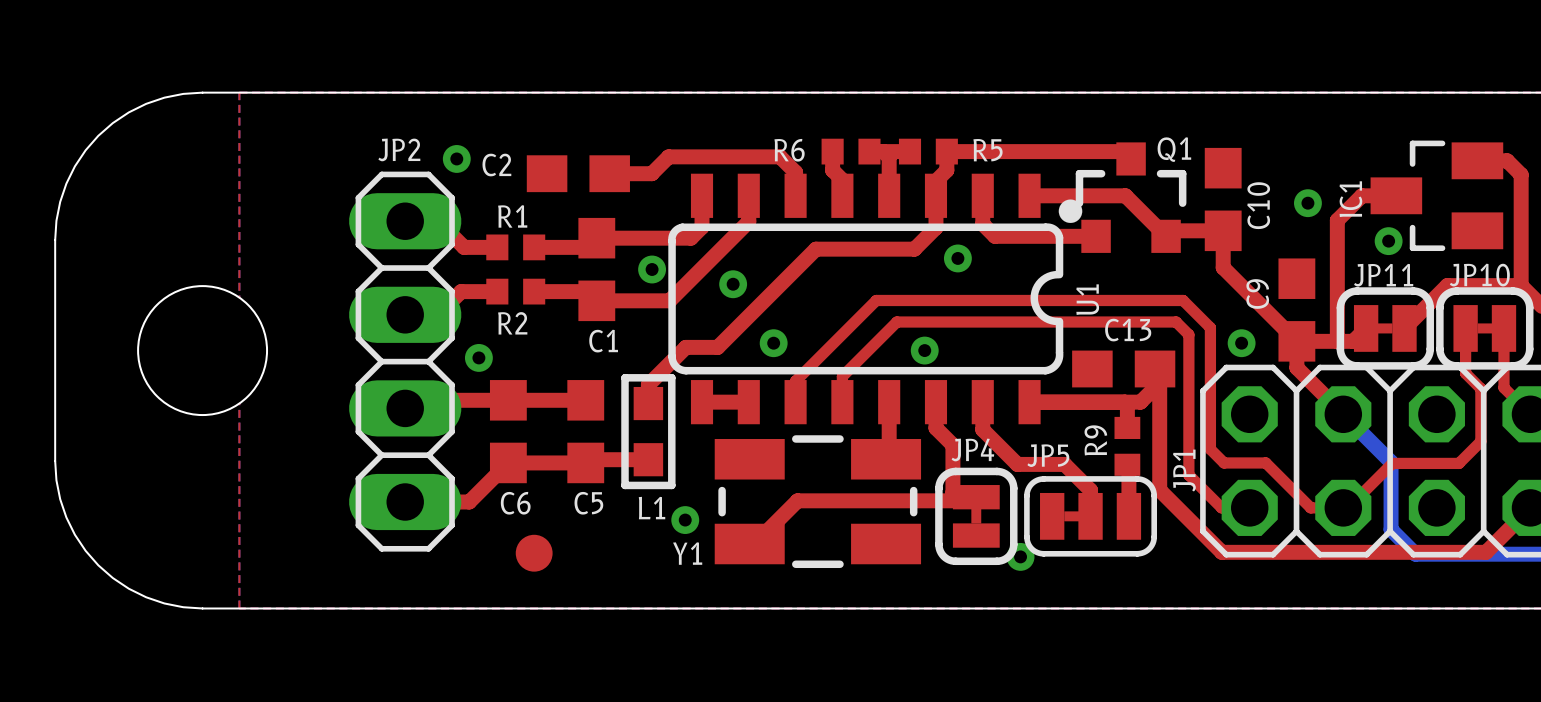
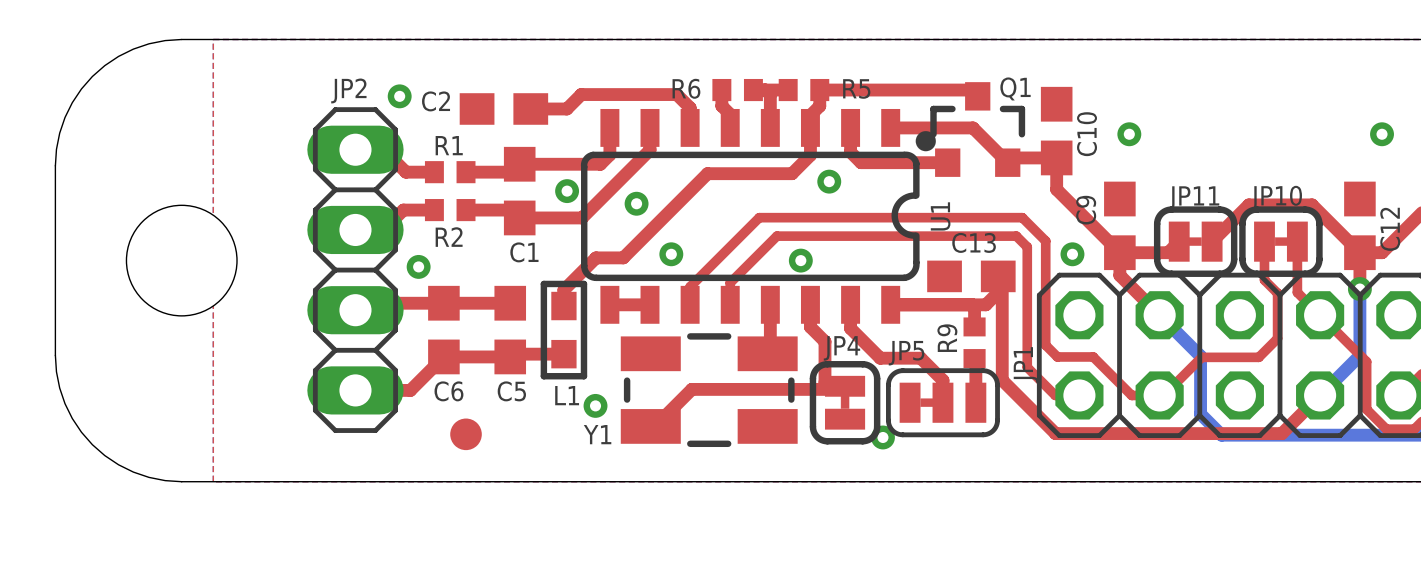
top track: (1477, 160) (1507, 160) (1521, 174) (1521, 285) -> none
top track: (1396, 195) (1361, 195) (1337, 220) (1337, 341) -> none
IC1: (1436, 195) -> none
via: (1388, 241) -> none

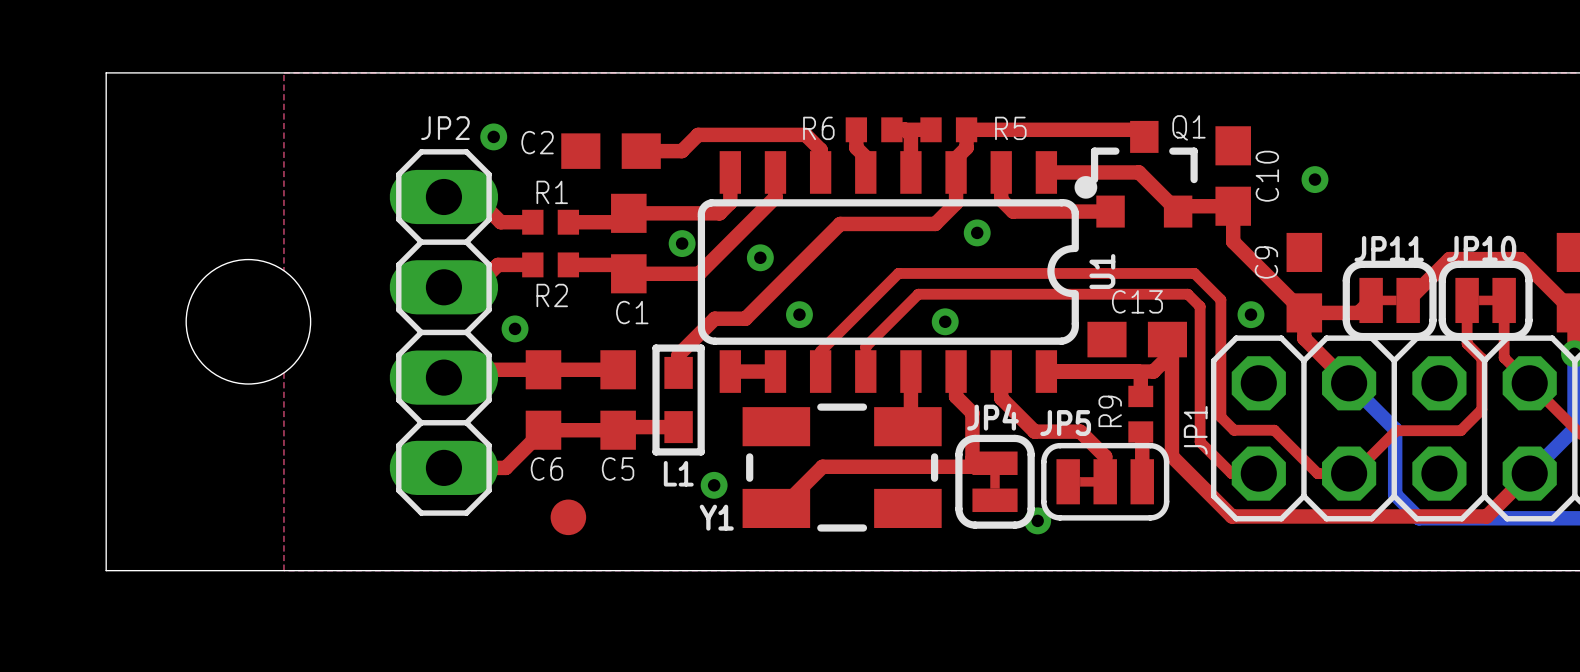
board edge: (181, 39) (165, 40) (133, 49) (118, 56) (92, 76) (72, 102) (65, 117) (56, 149) (55, 165) -> (248, 72) (106, 72) (106, 215)
board edge: (55, 355) (56, 371) (65, 403) (72, 418) (92, 444) (118, 464) (133, 472) (165, 480) (181, 481) -> (106, 428) (106, 570) (248, 570)

